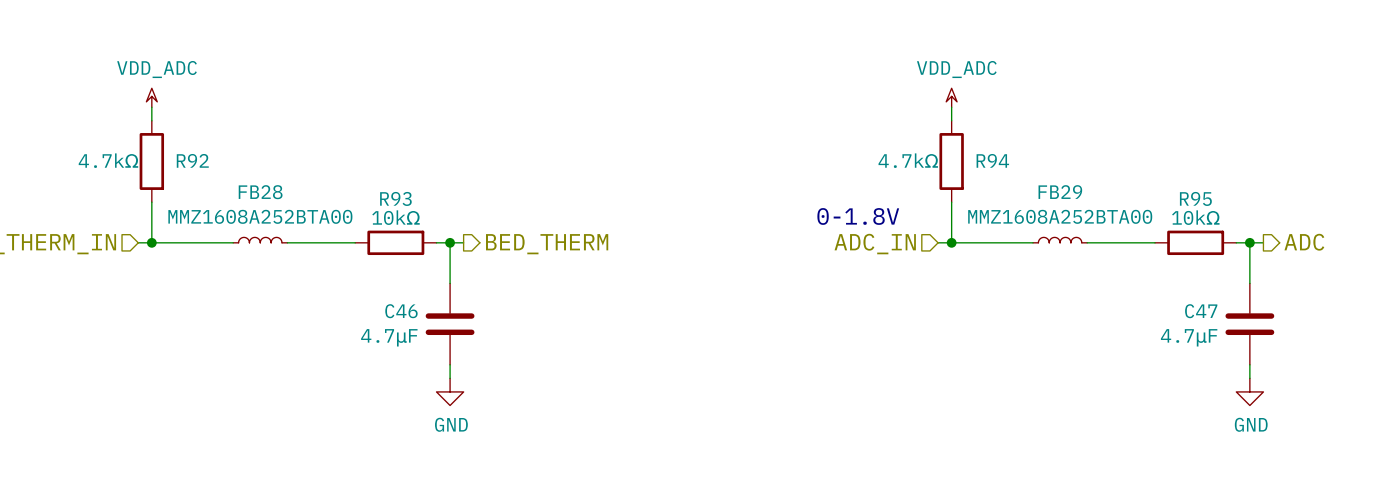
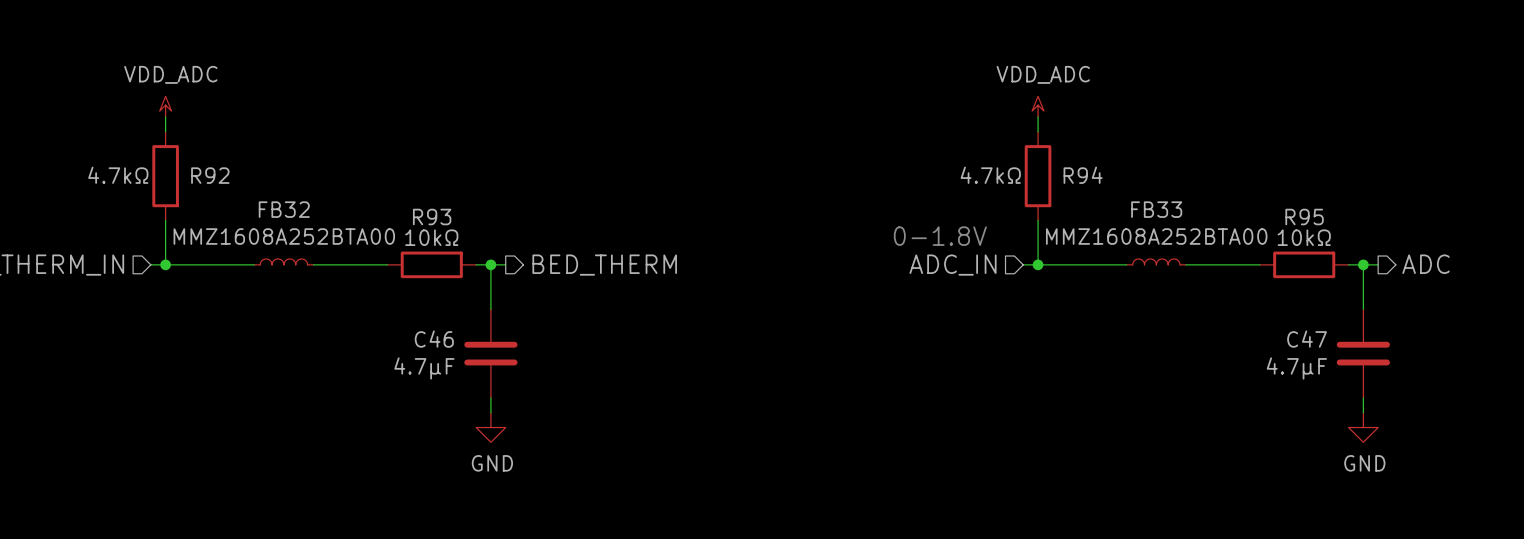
FB28 name: FB28 (260, 192) -> FB32 (284, 209)
FB29 name: FB29 (1060, 192) -> FB33 (1156, 209)

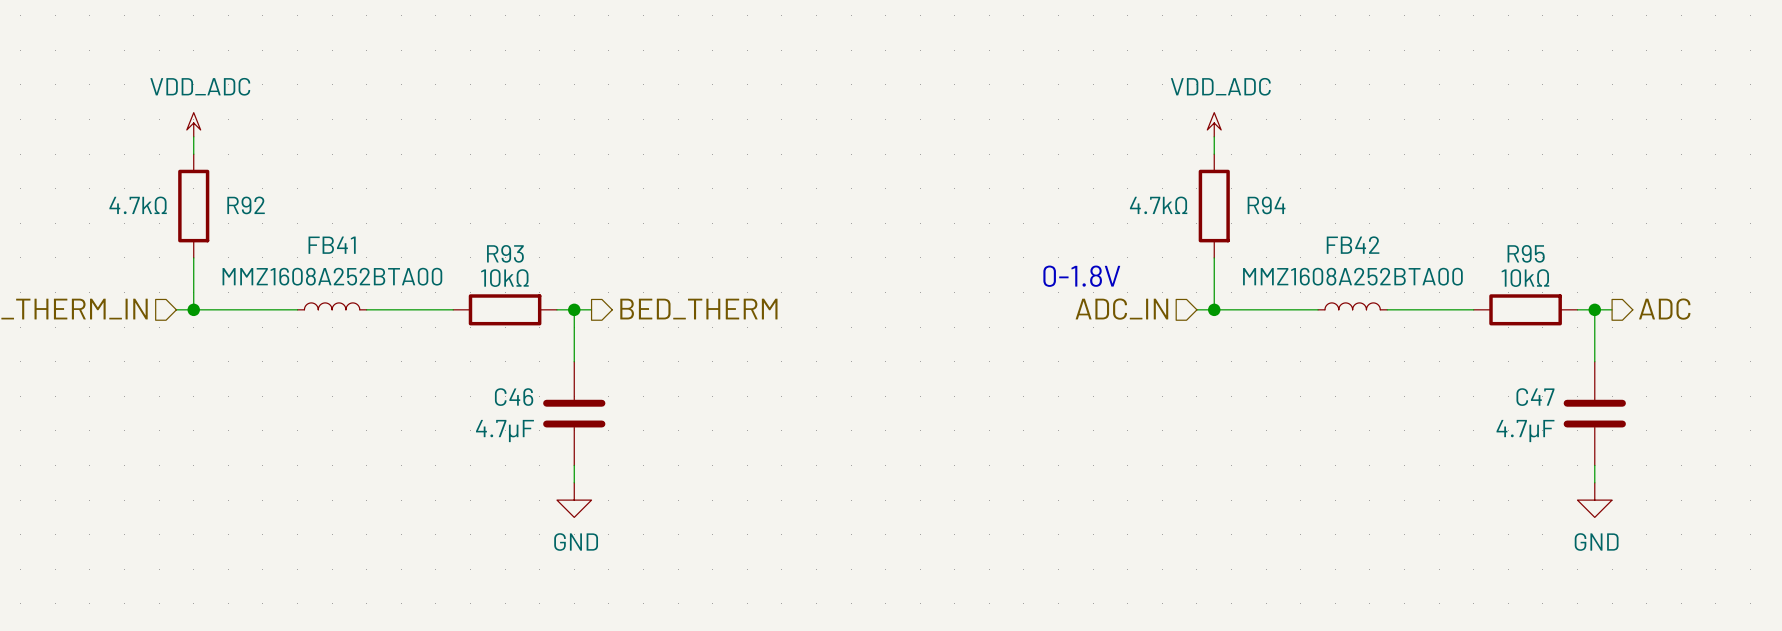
FB32 name: FB32 (284, 209) -> FB41 (332, 245)
FB33 name: FB33 (1156, 209) -> FB42 (1353, 245)

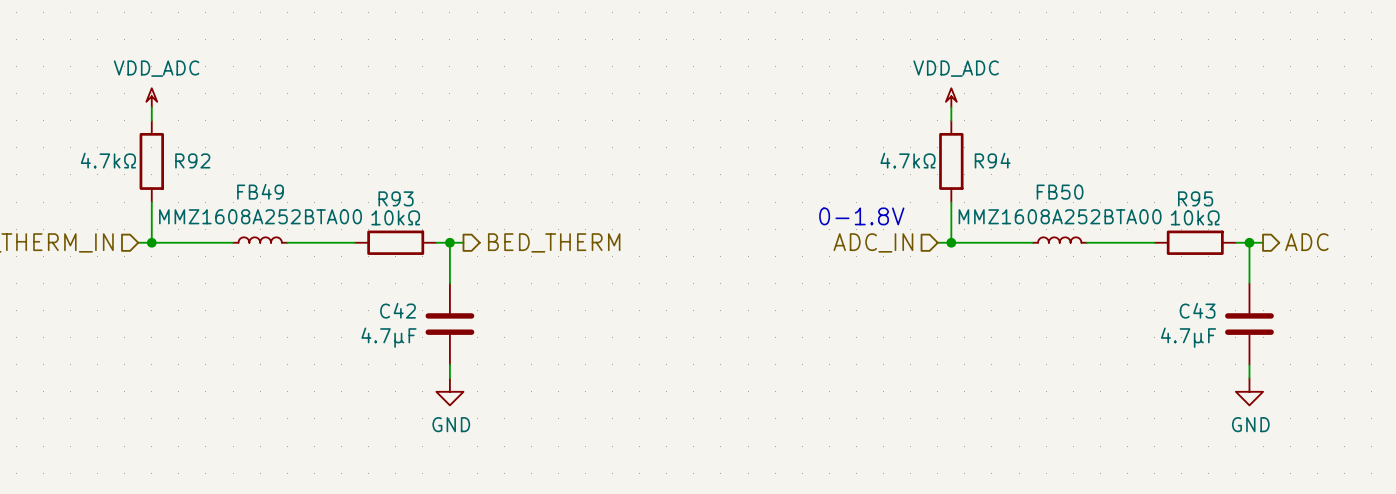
FB41 name: FB41 (332, 245) -> FB49 (260, 191)
FB42 name: FB42 (1353, 245) -> FB50 (1060, 192)
C46 name: C46 (514, 397) -> C42 (398, 310)
C47 name: C47 (1535, 397) -> C43 (1197, 310)

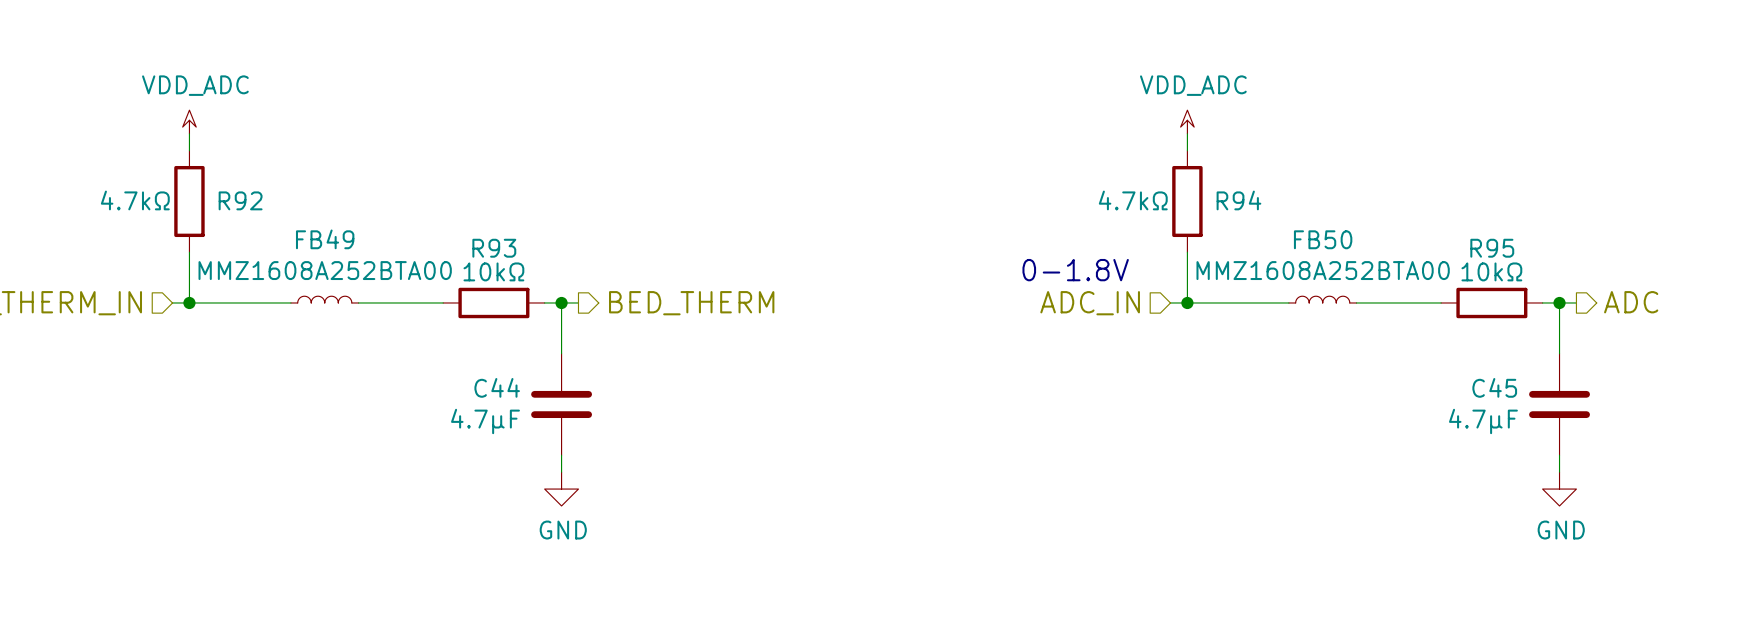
C42 name: C42 (398, 310) -> C44 (497, 387)
C43 name: C43 (1197, 310) -> C45 (1494, 387)

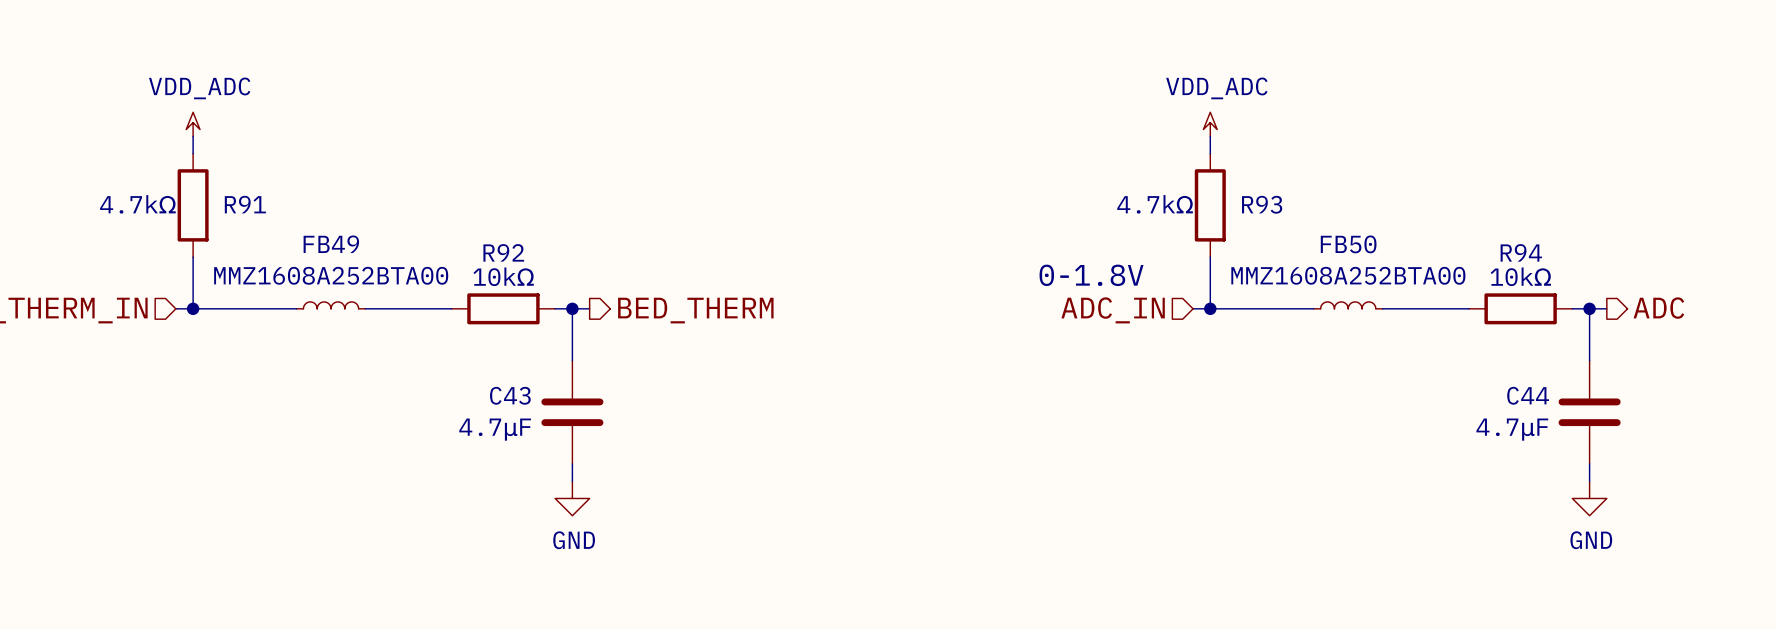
R92 name: R92 (240, 200) -> R91 (245, 204)
R94 name: R94 (1238, 200) -> R93 (1262, 204)
R93 name: R93 (494, 248) -> R92 (503, 252)
R95 name: R95 (1492, 248) -> R94 (1521, 252)
C44 name: C44 (497, 387) -> C43 (510, 395)
C45 name: C45 (1494, 387) -> C44 (1528, 395)

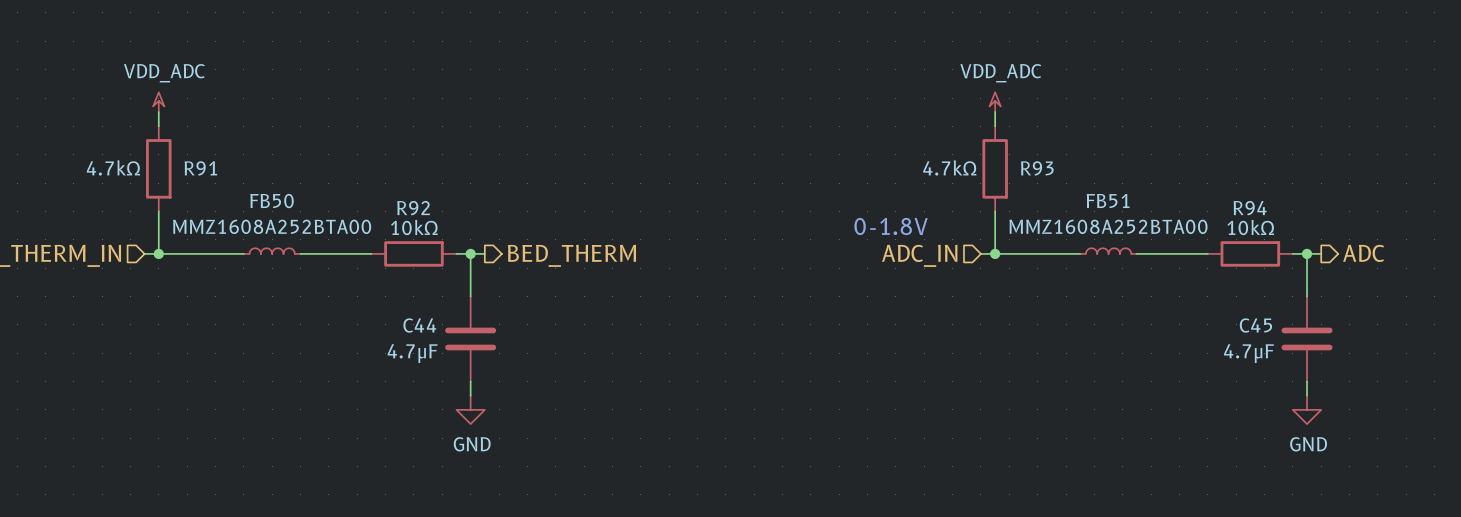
FB49 name: FB49 (331, 244) -> FB50 (272, 201)
FB50 name: FB50 (1348, 244) -> FB51 (1108, 200)
C43 name: C43 (510, 395) -> C44 (419, 325)
C44 name: C44 (1528, 395) -> C45 (1255, 325)

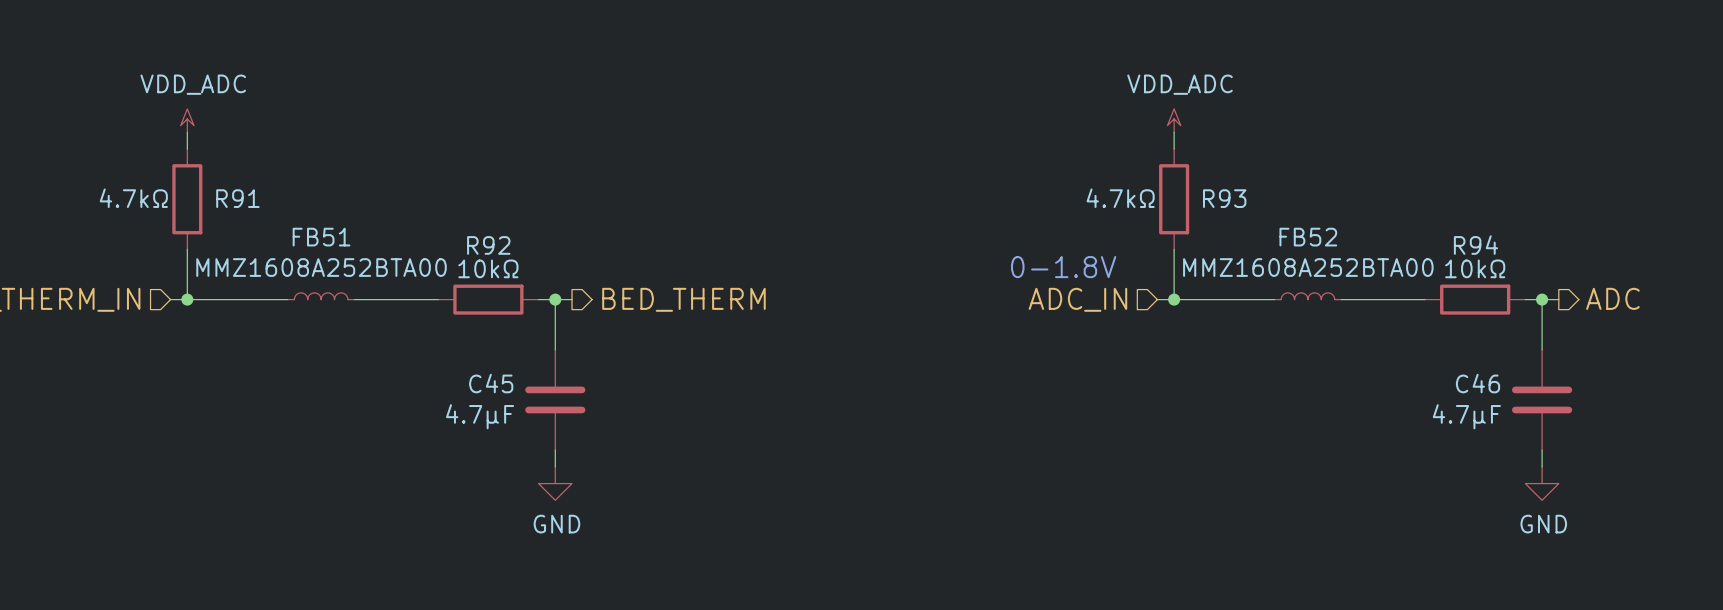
FB51 name: FB51 (1108, 200) -> FB52 (1308, 237)
FB50 name: FB50 (272, 201) -> FB51 (321, 237)
C44 name: C44 (419, 325) -> C45 (491, 383)
C45 name: C45 (1255, 325) -> C46 (1478, 383)

